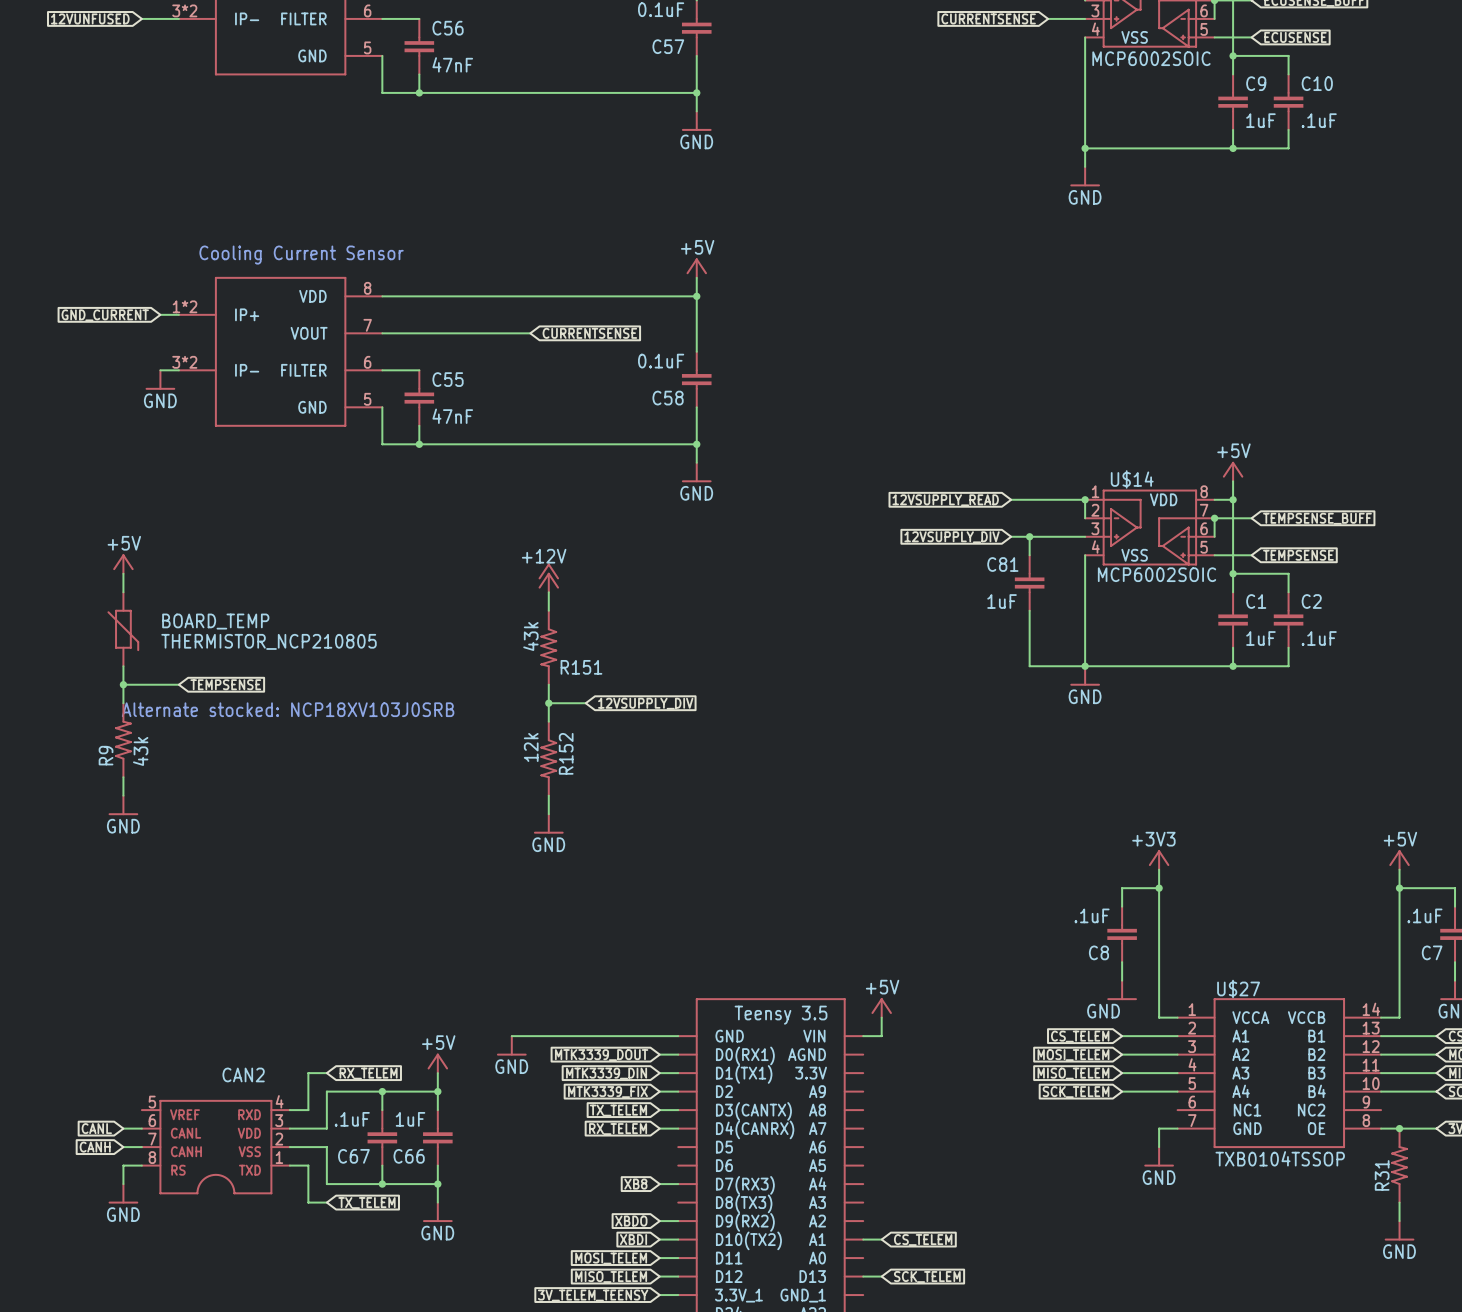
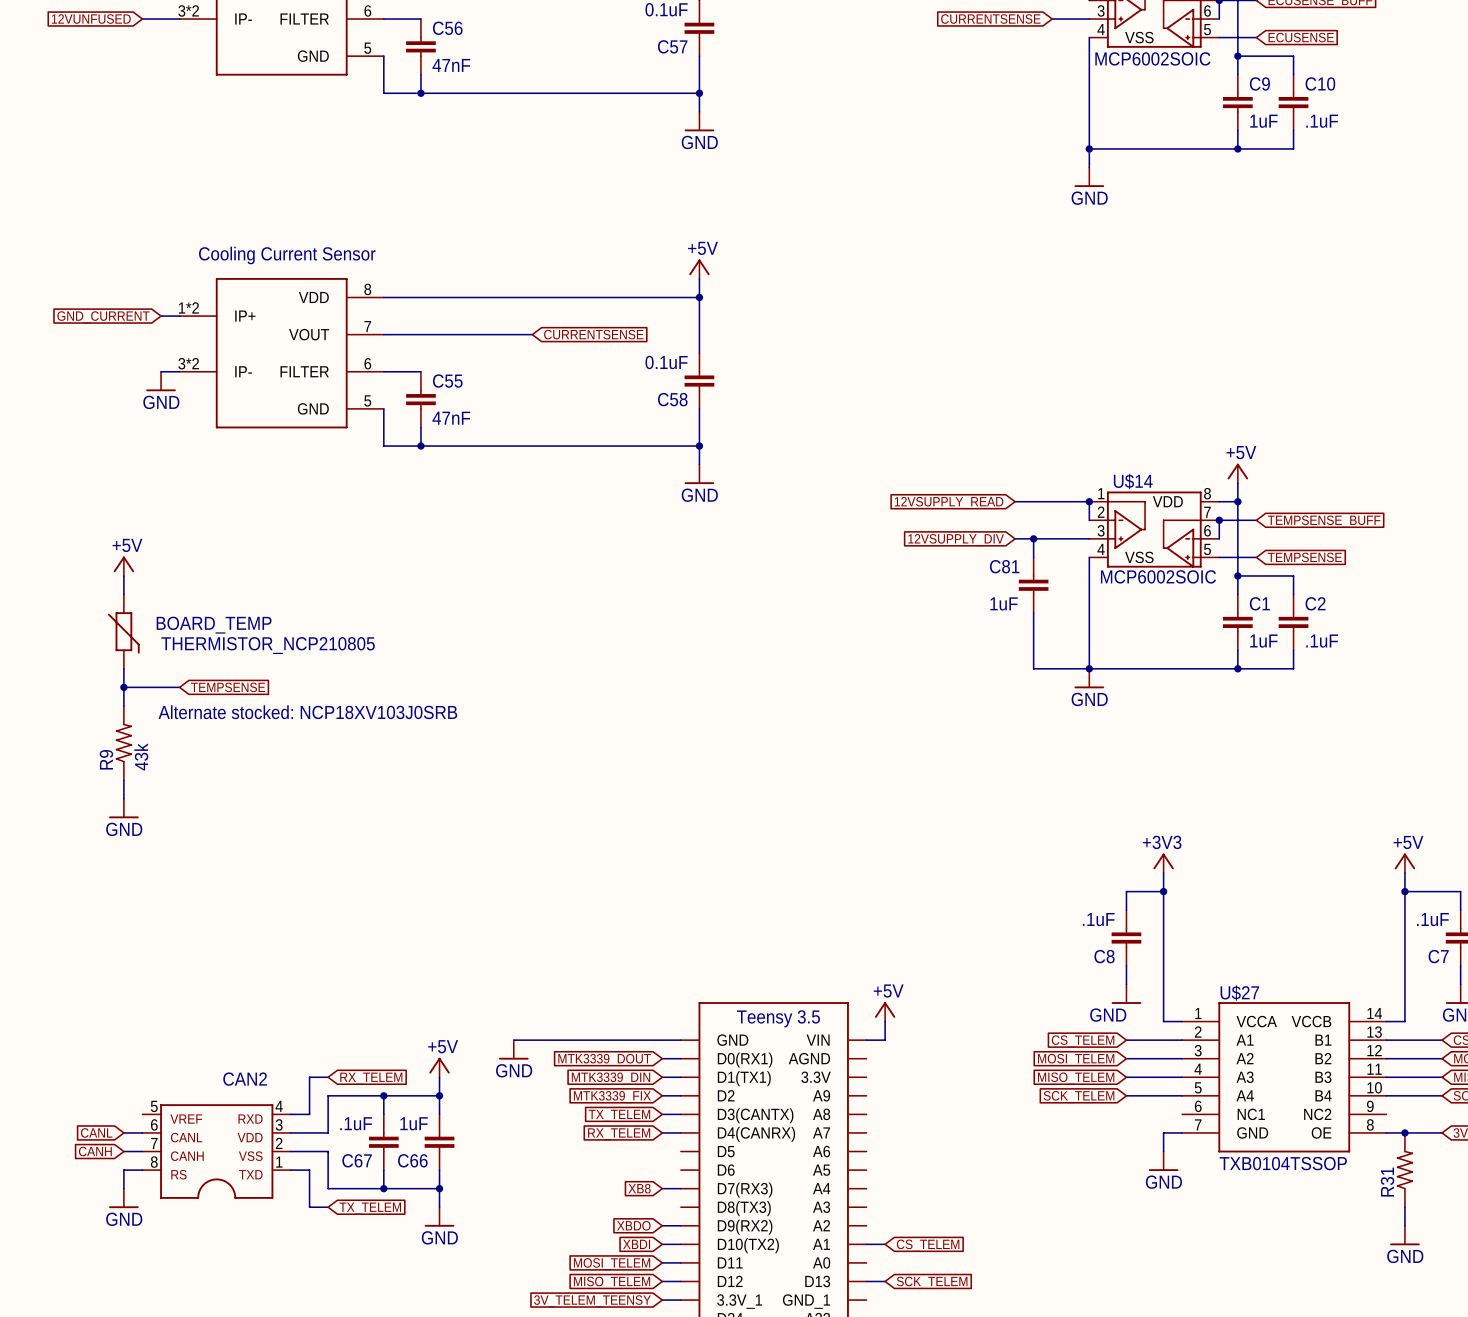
power symbol: +12V (548, 577) -> none
wire: (548, 592) (548, 610) -> none
R151: 43k (548, 647) -> none
wire: (548, 684) (548, 721) -> none
wire: (548, 703) (585, 703) -> none
junction: (548, 703) -> none
global label: 12VSUPPLY_DIV (645, 703) -> none
R152: 12k (548, 758) -> none
wire: (548, 795) (548, 814) -> none
power symbol: GND (548, 823) -> none

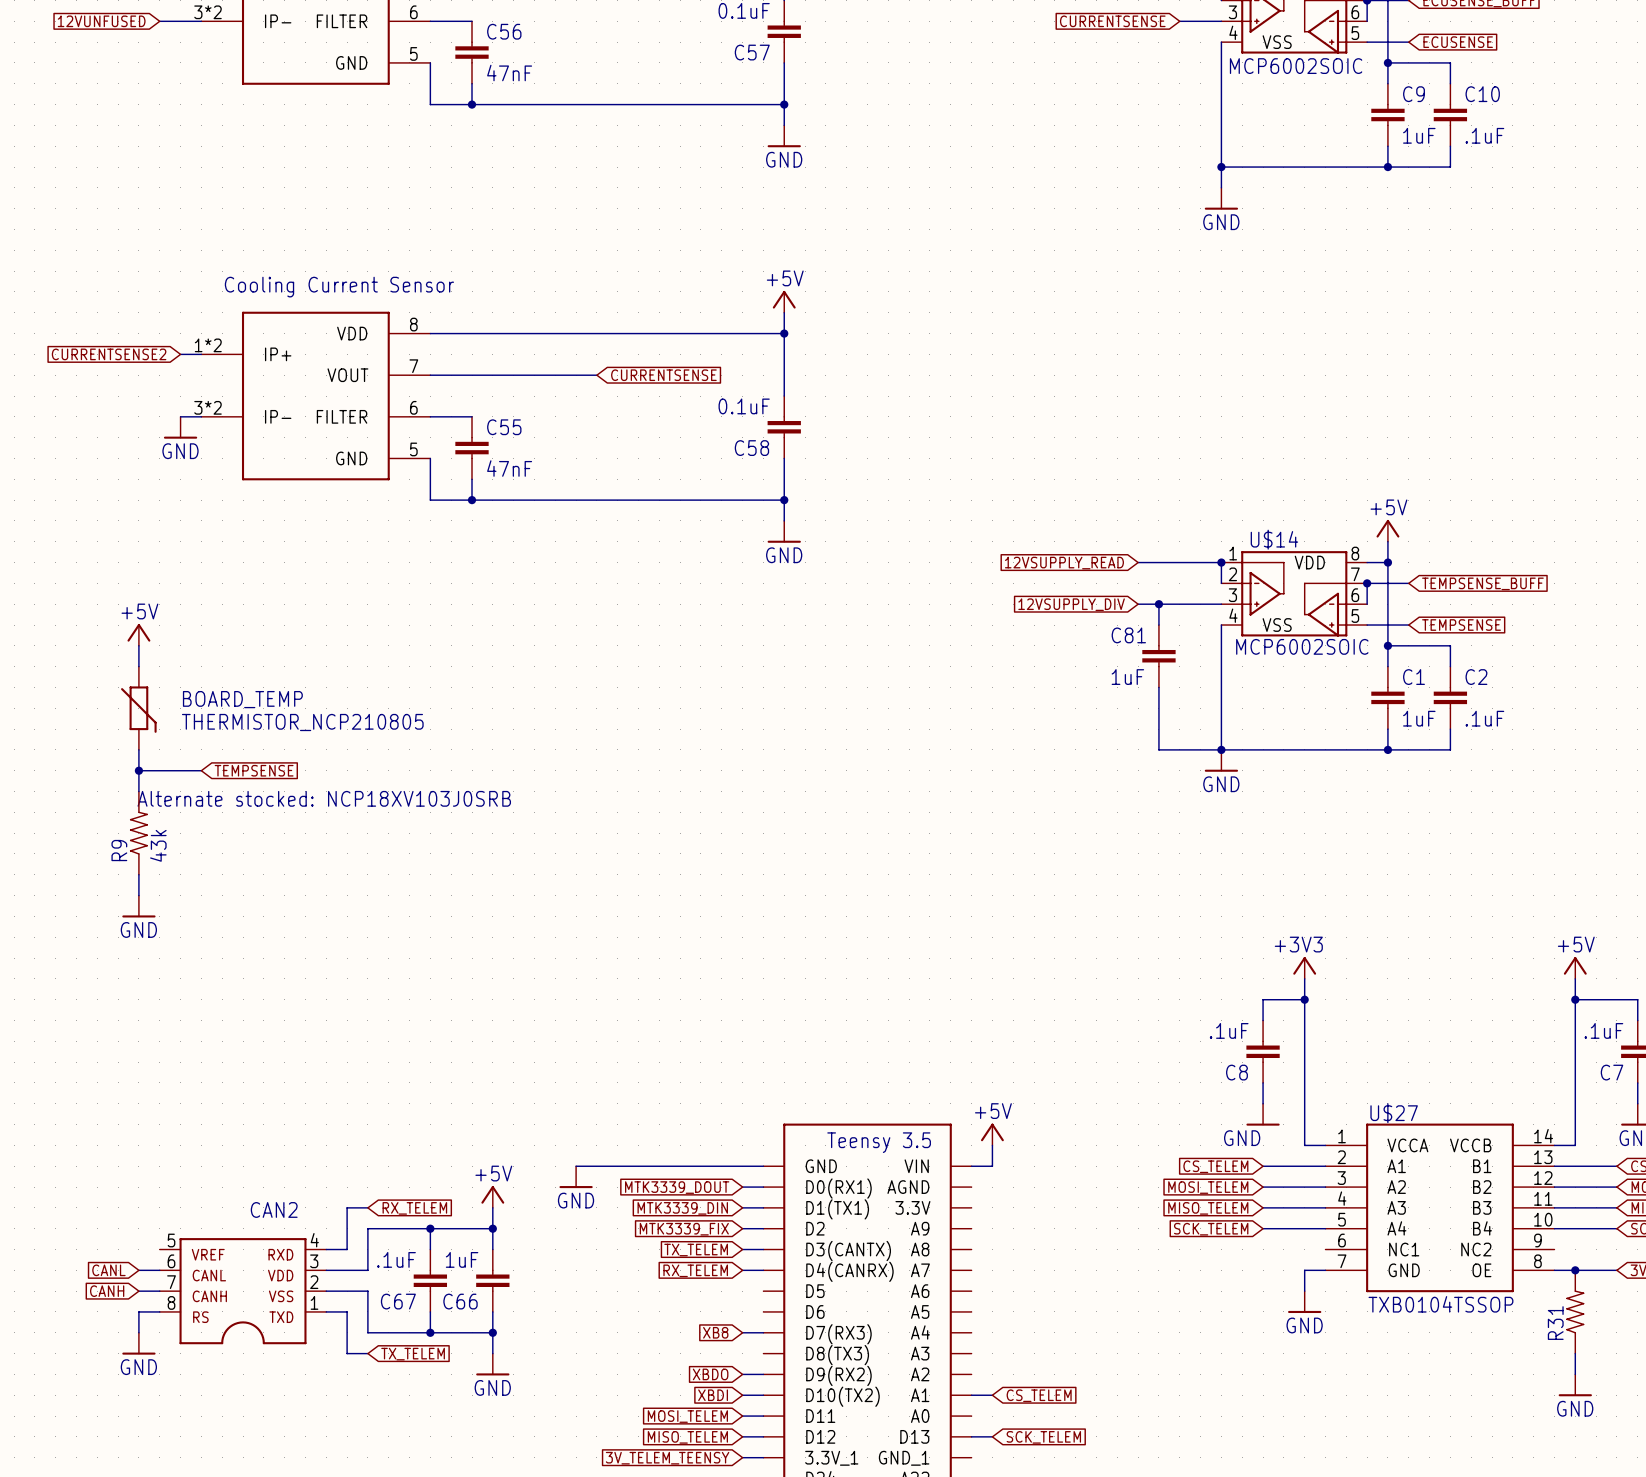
global label: GND_CURRENT (103, 317) -> CURRENTSENSE2 (109, 354)

